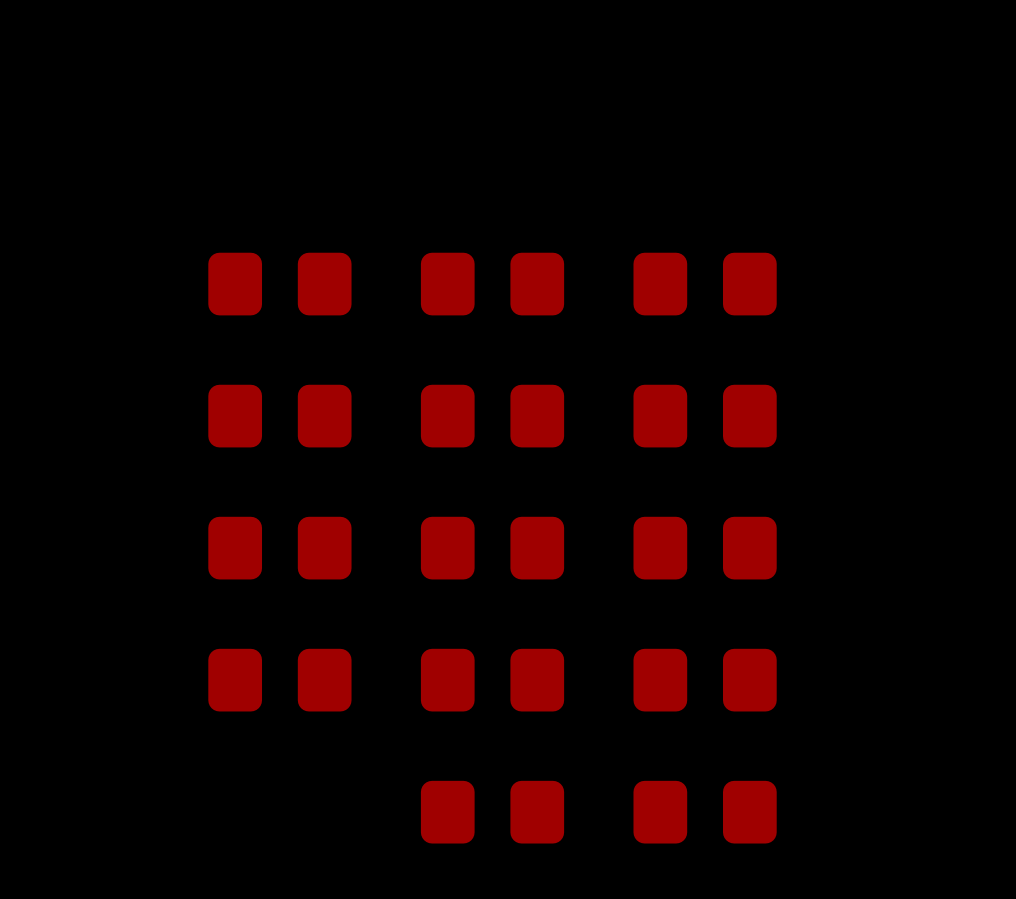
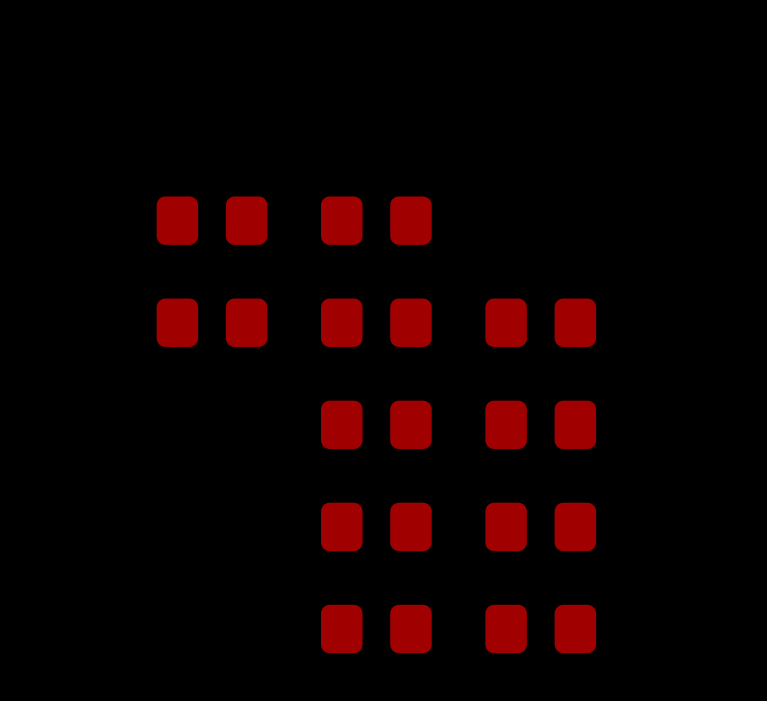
part: (705, 284) -> none
part: (279, 548) -> none
part: (279, 680) -> none

